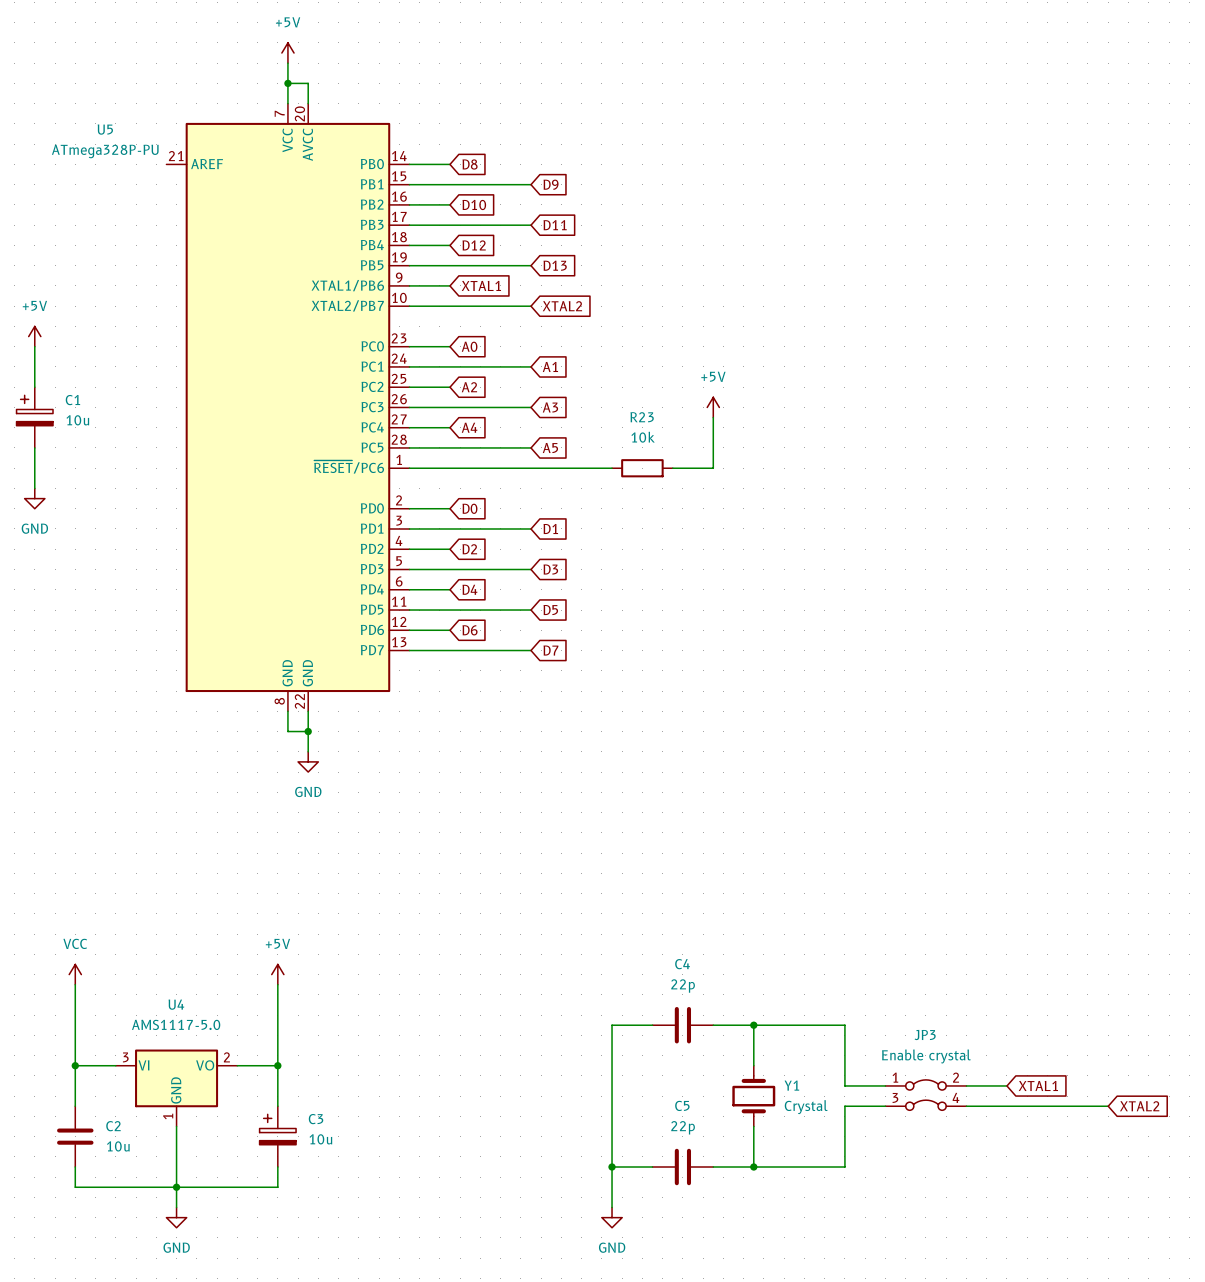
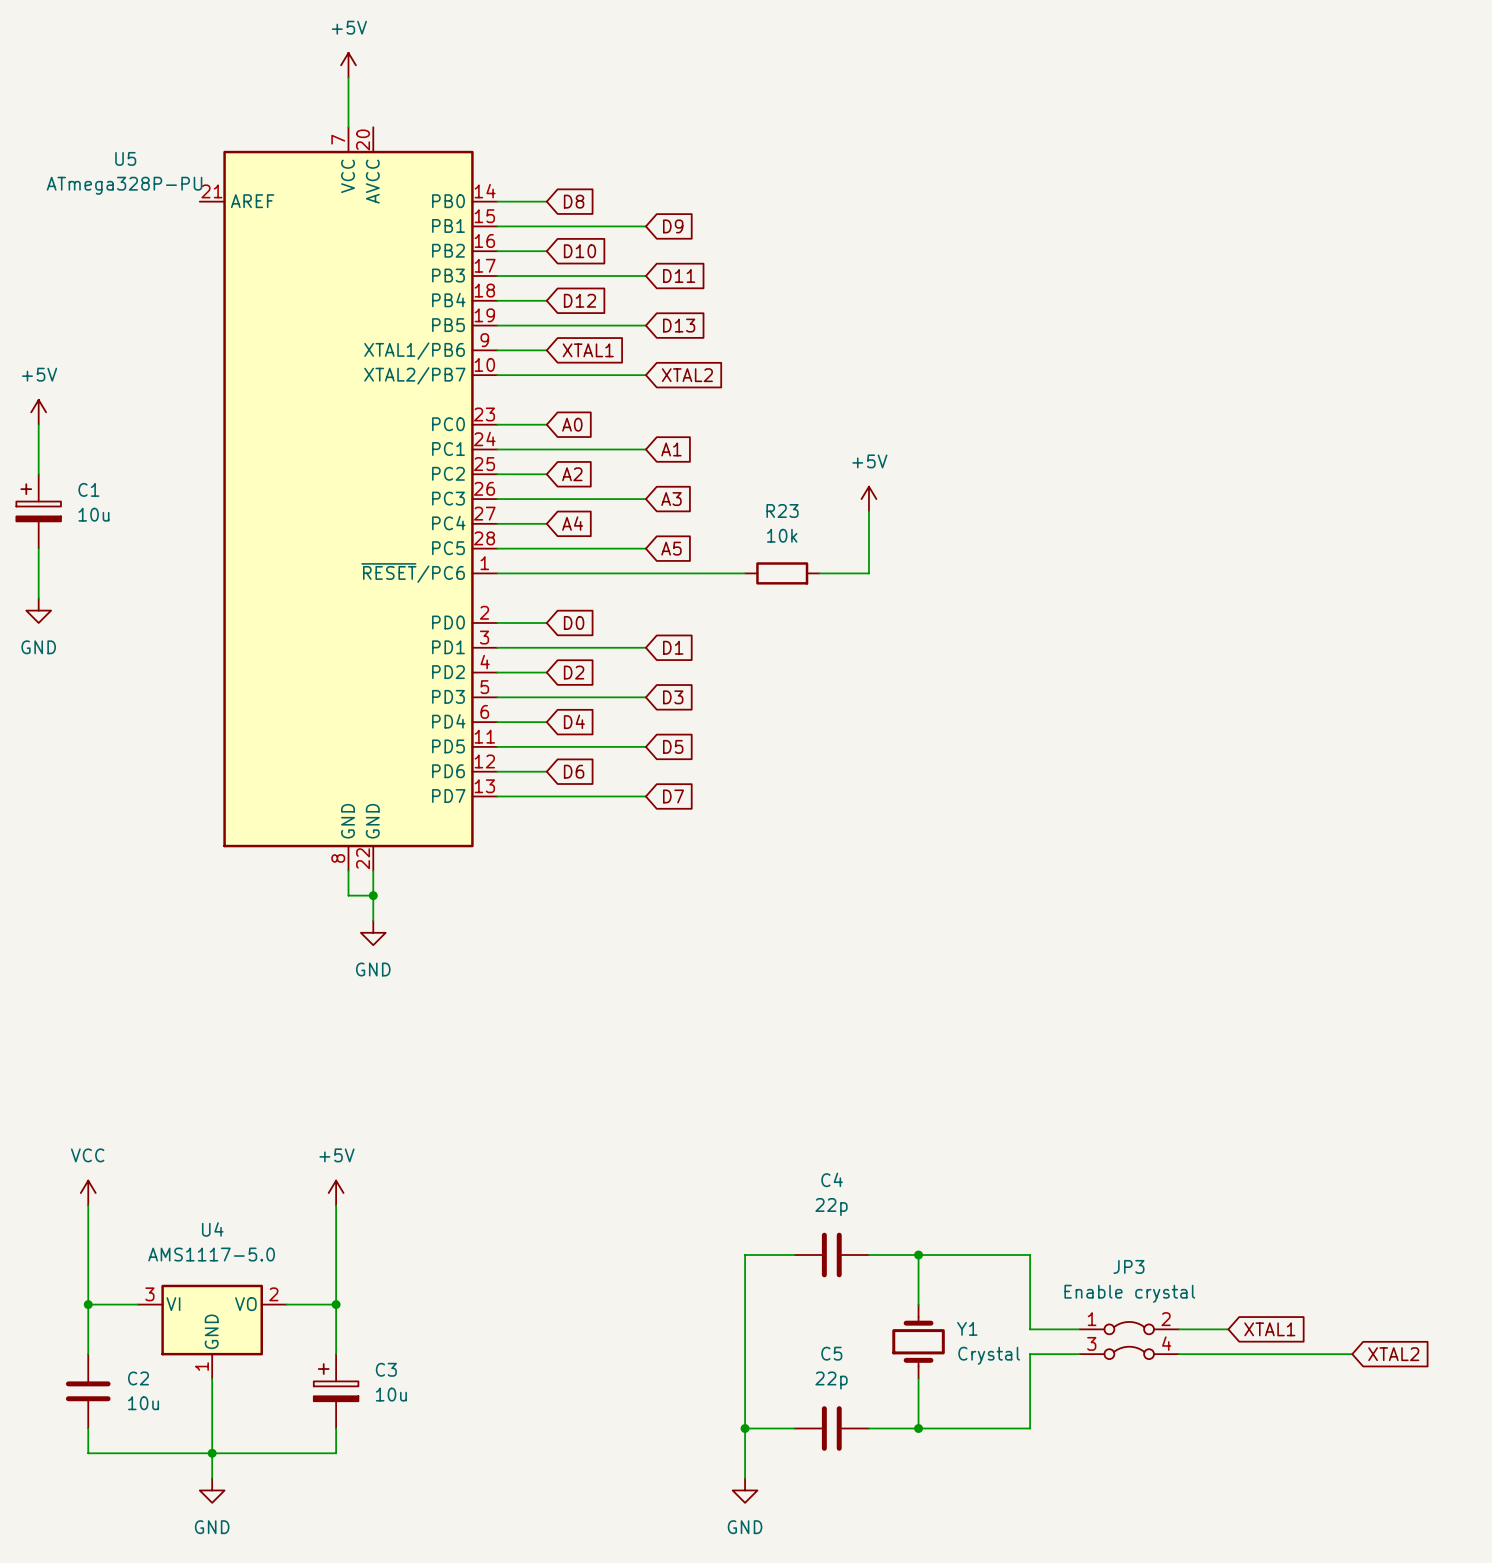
wire: (287, 83) (308, 83) (308, 103) -> none
junction: (287, 83) -> none

